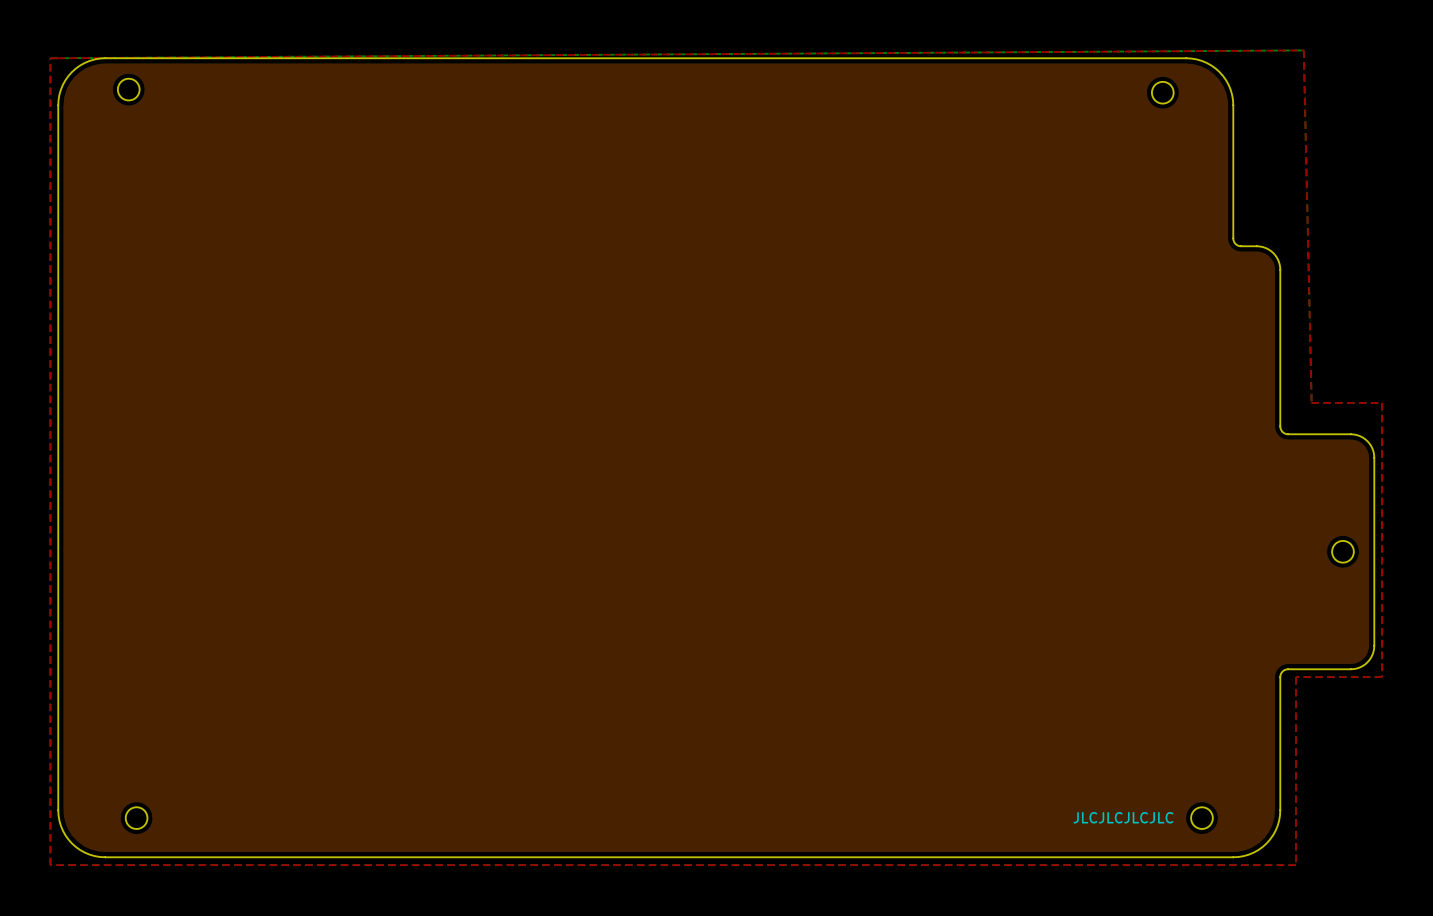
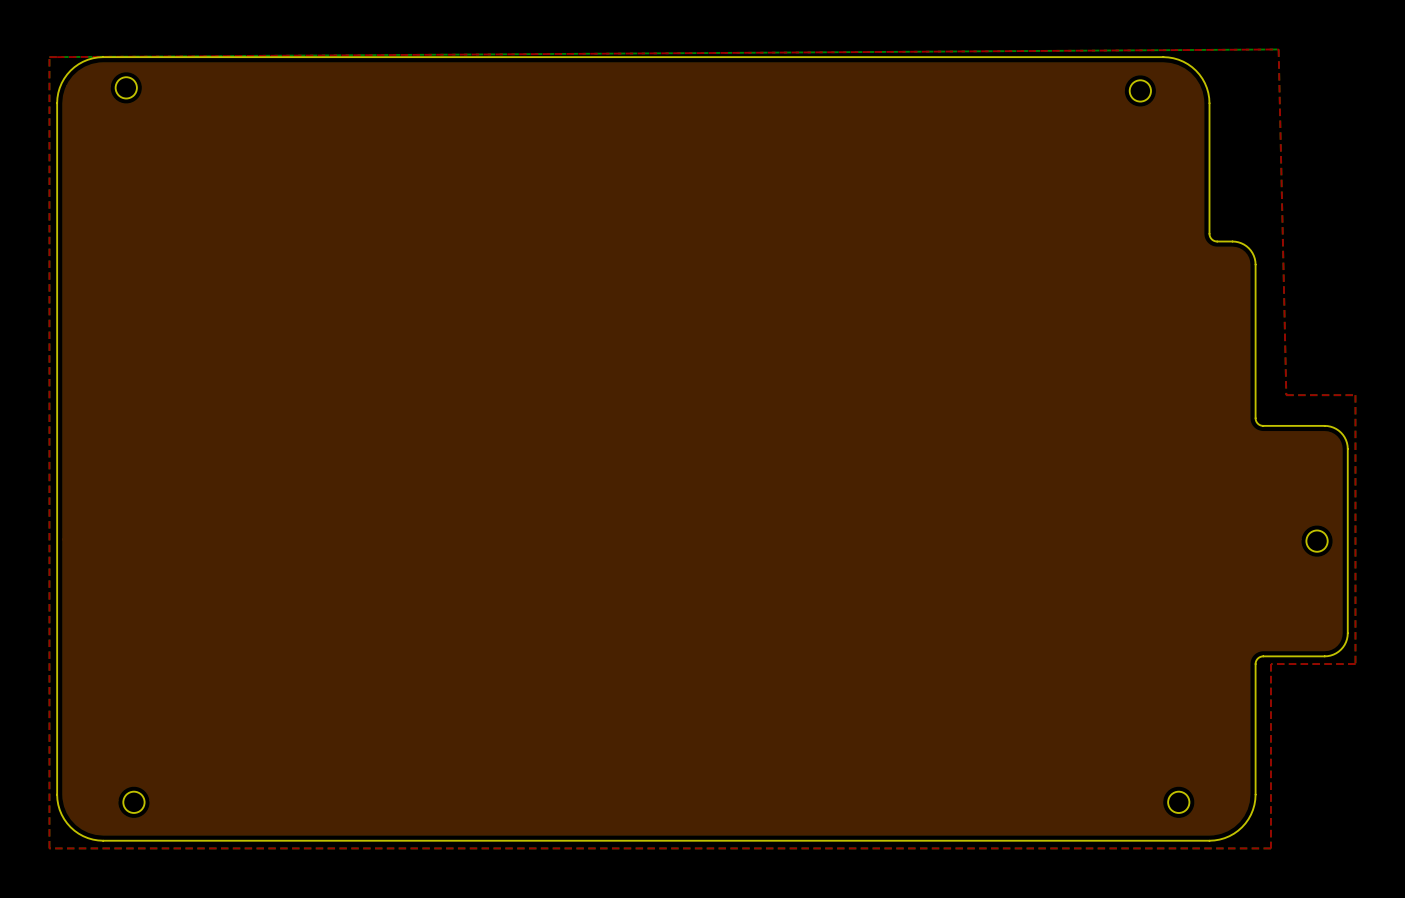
text: JLCJLCJLCJLC (1123, 817) -> none

